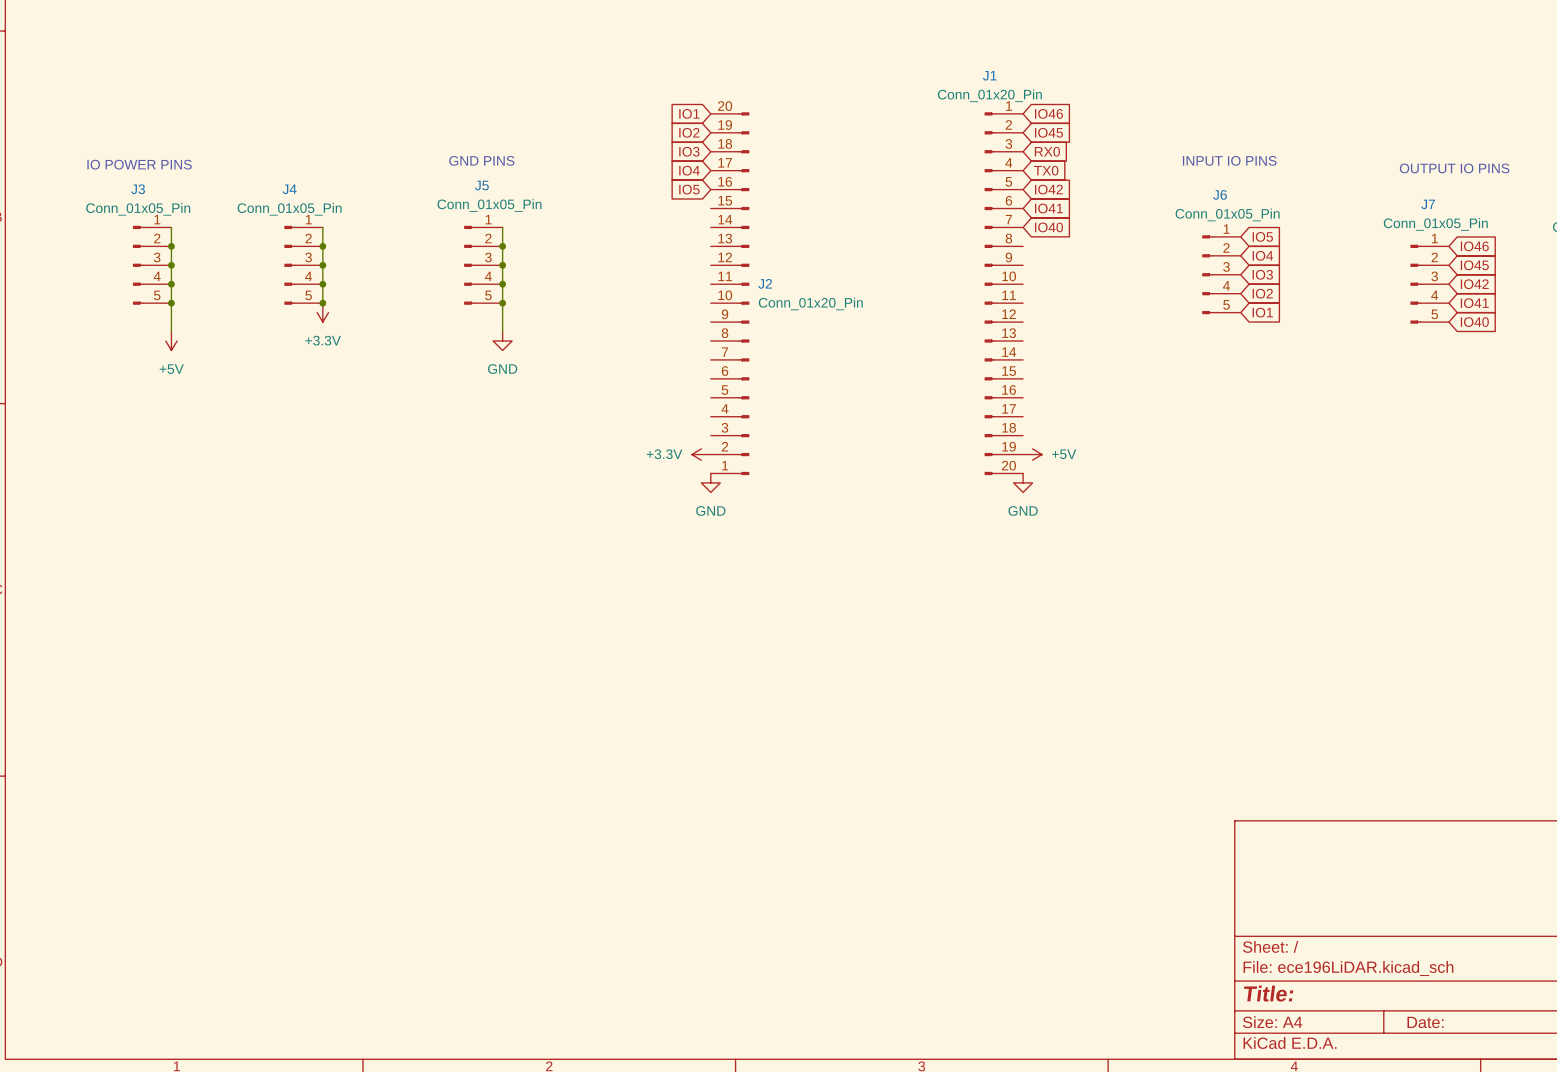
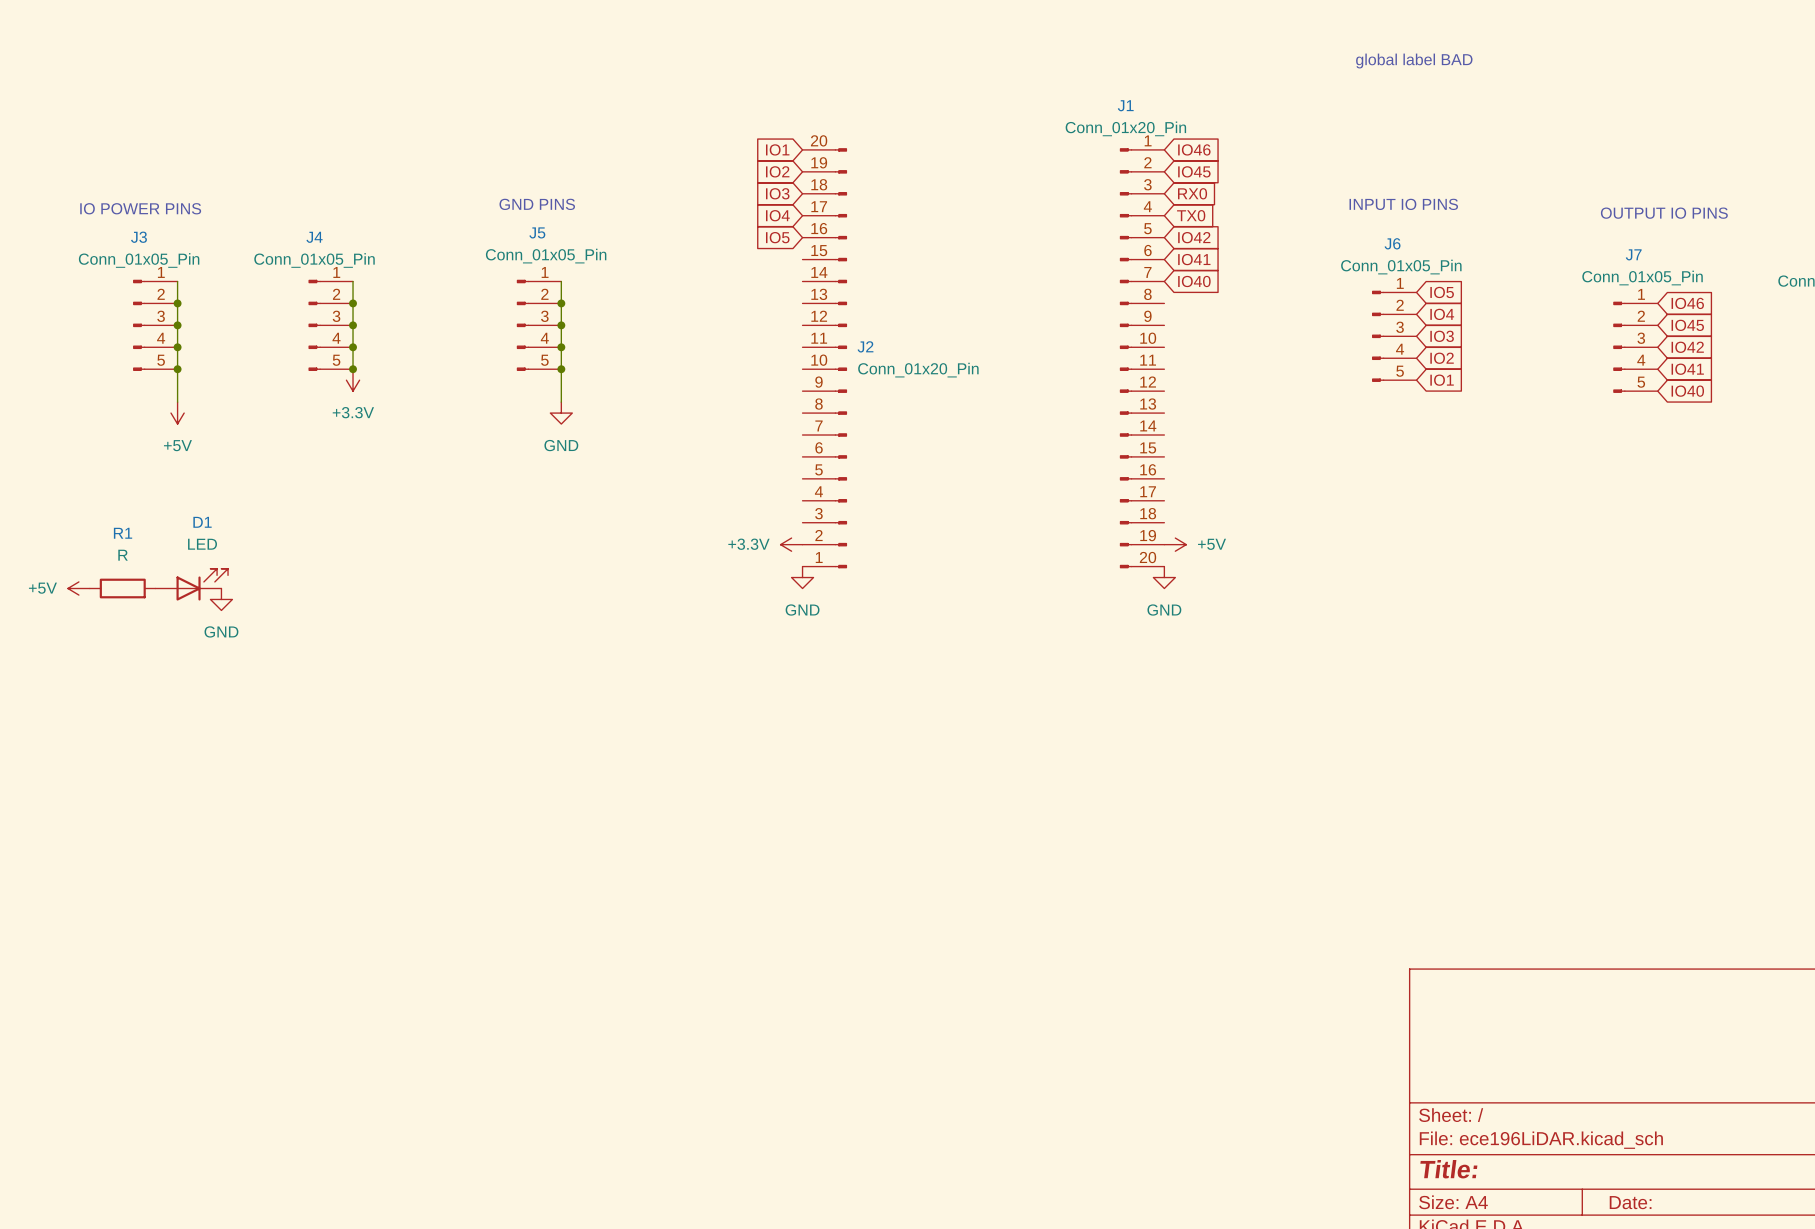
text: none -> global label BAD (1414, 61)
D1: none -> LED (191, 584)
power symbol: none -> +5V (78, 588)
R1: none -> R (122, 588)
power symbol: none -> GND (221, 599)

